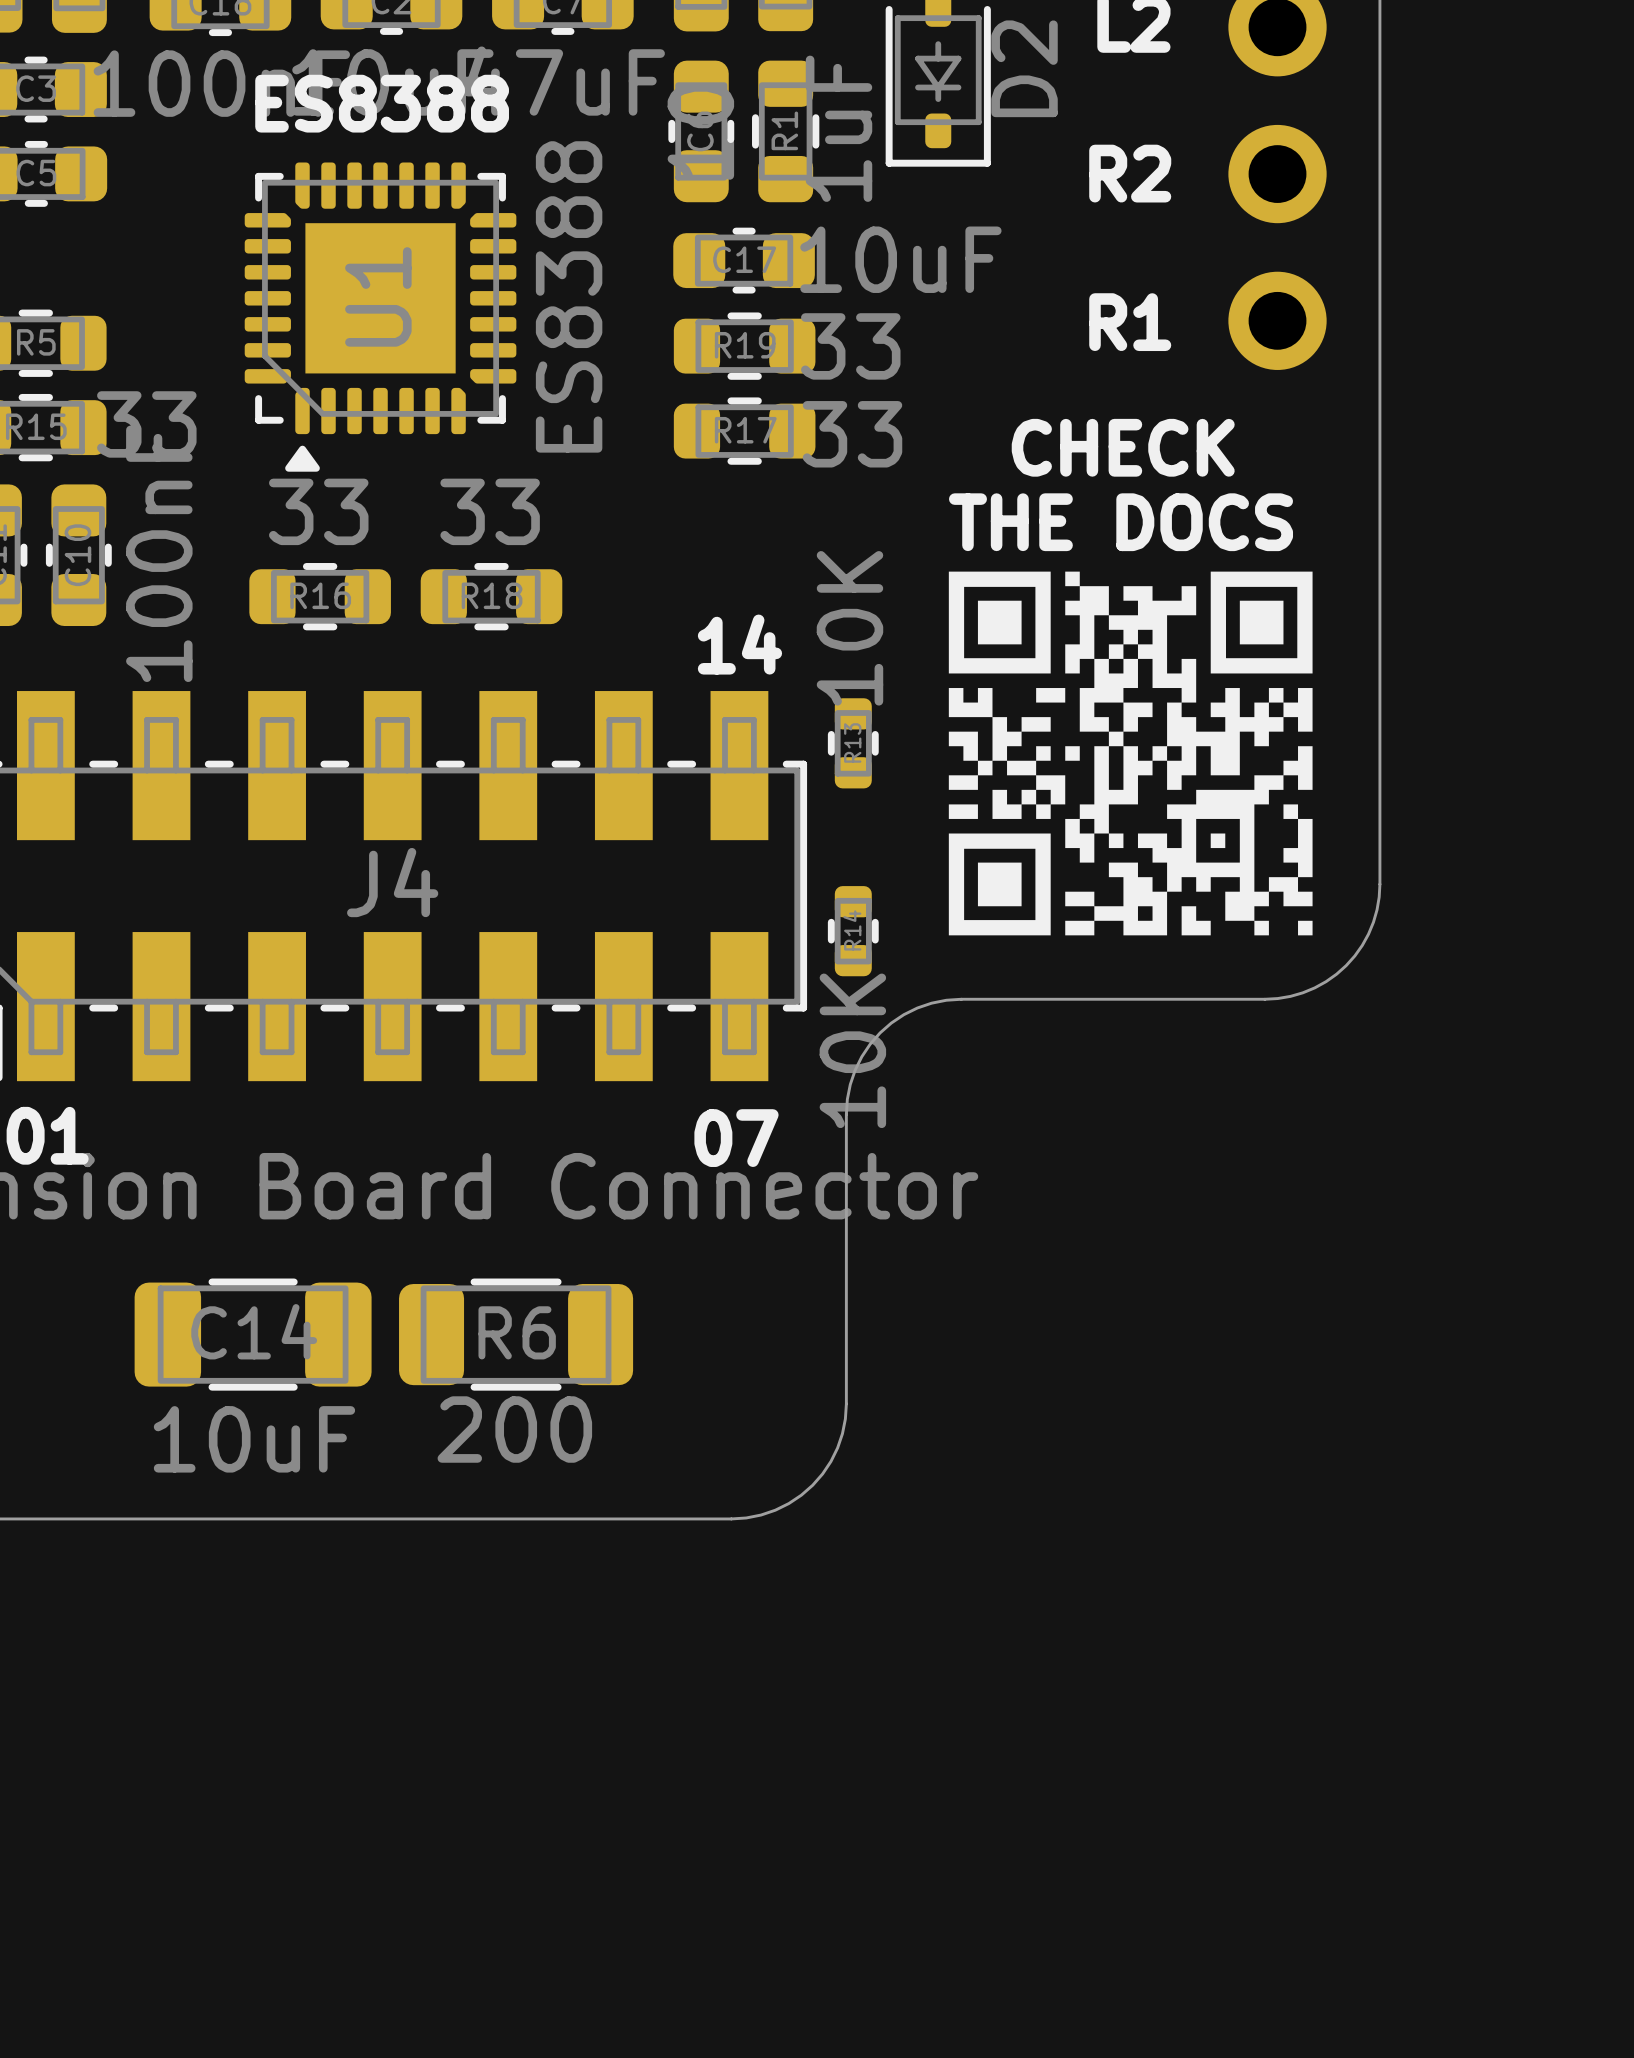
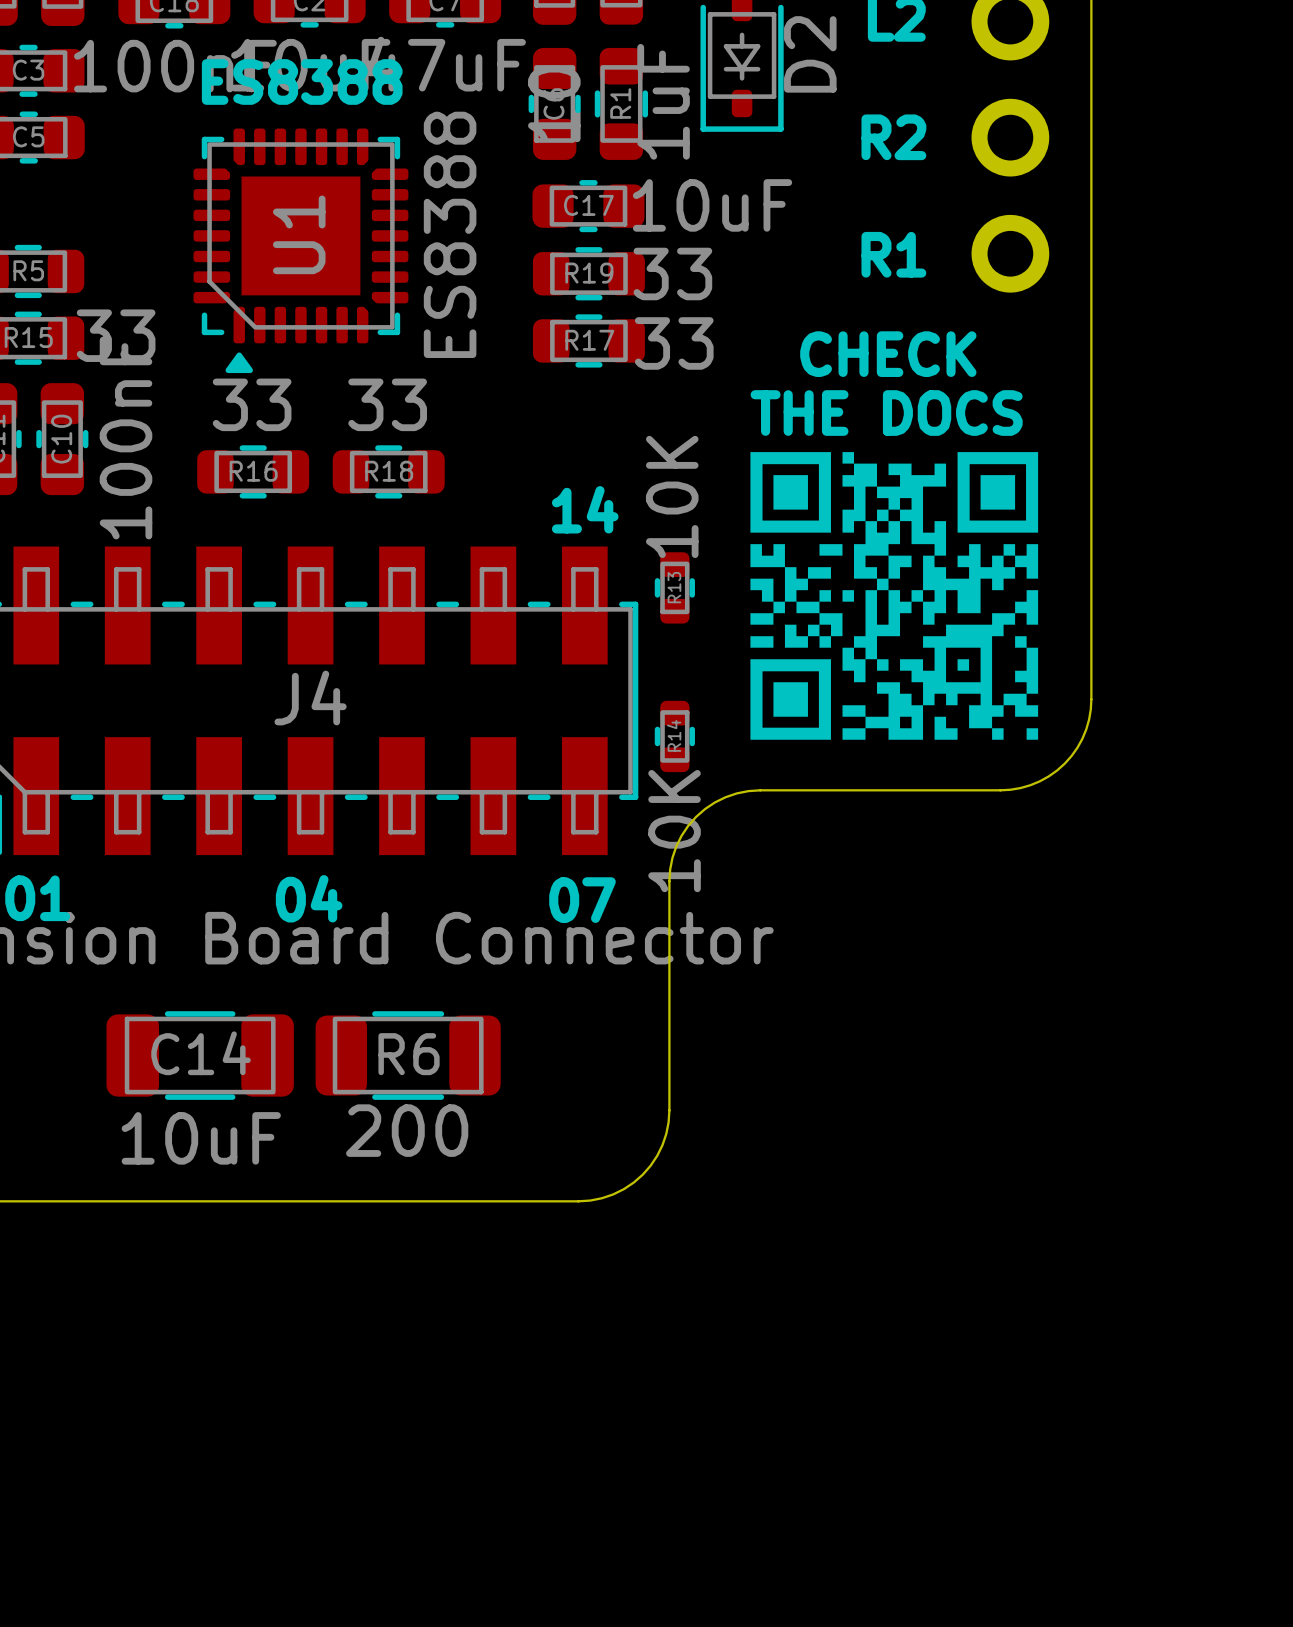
text: none -> 04 (309, 898)

